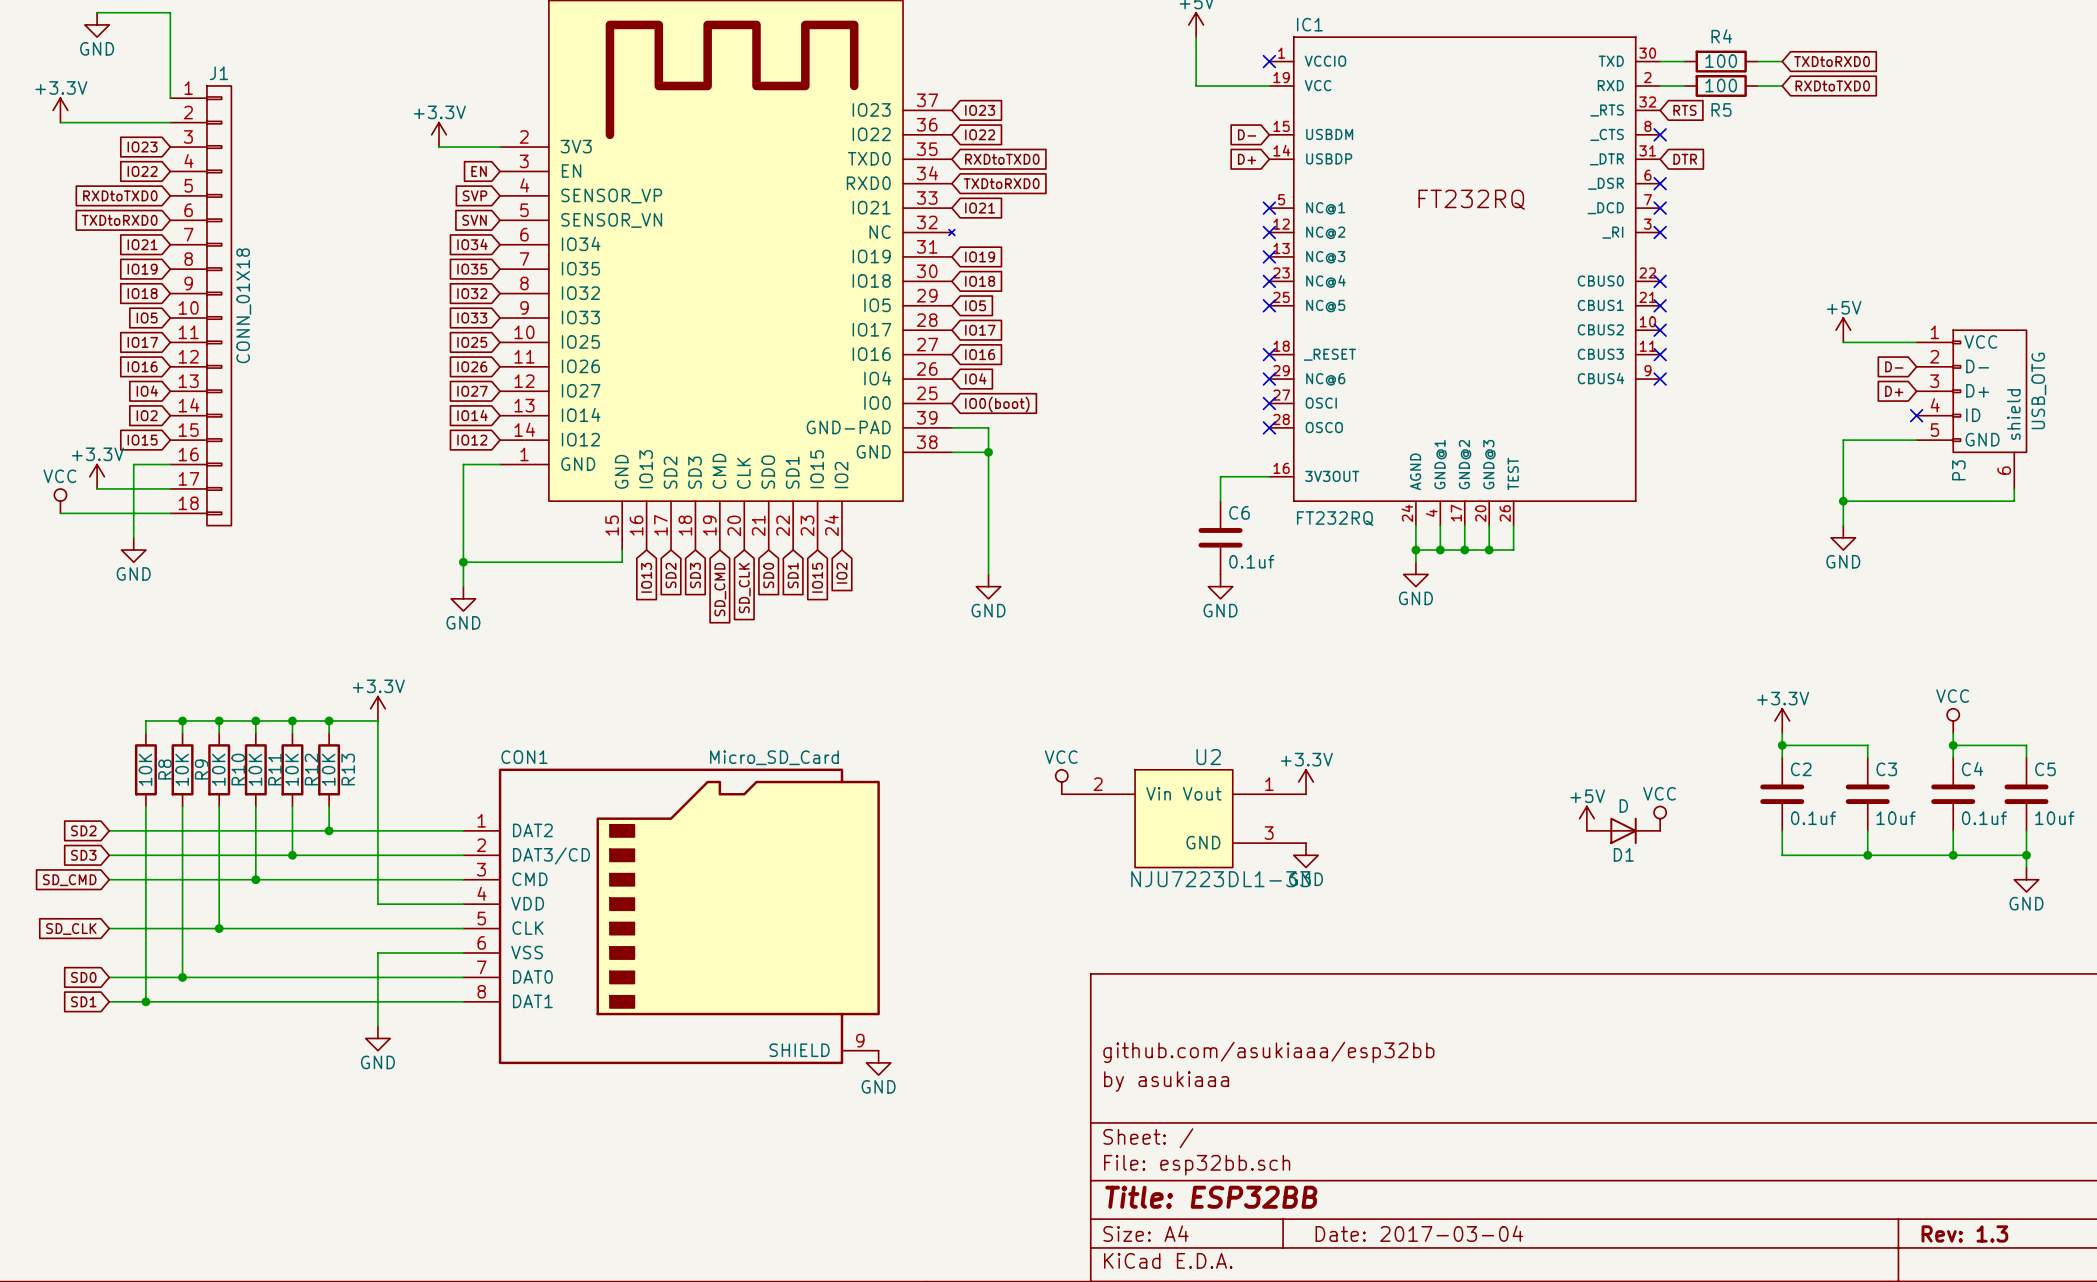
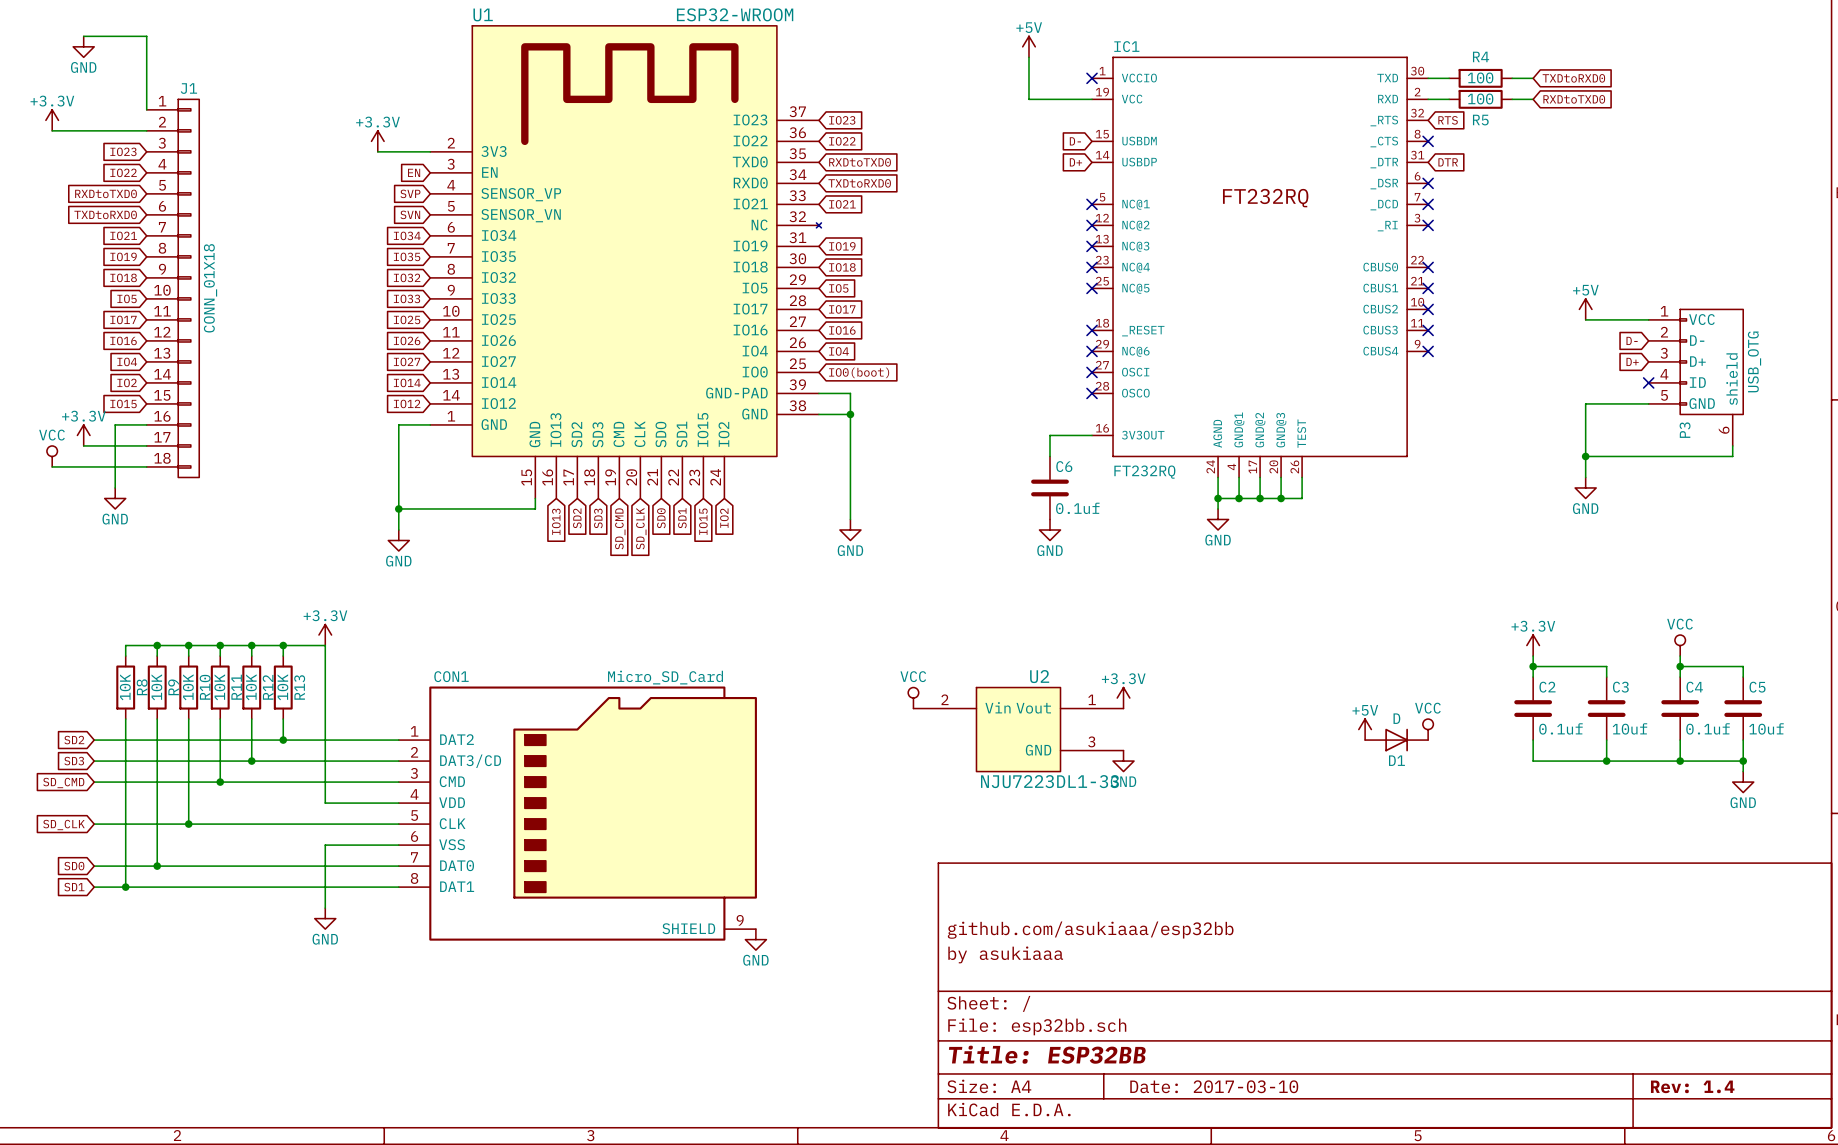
title block: Date: 2017-03-04 (1419, 1233) -> Date: 2017-03-10 (1214, 1086)
title block: Rev: 1.3 (1964, 1233) -> Rev: 1.4 (1692, 1086)

